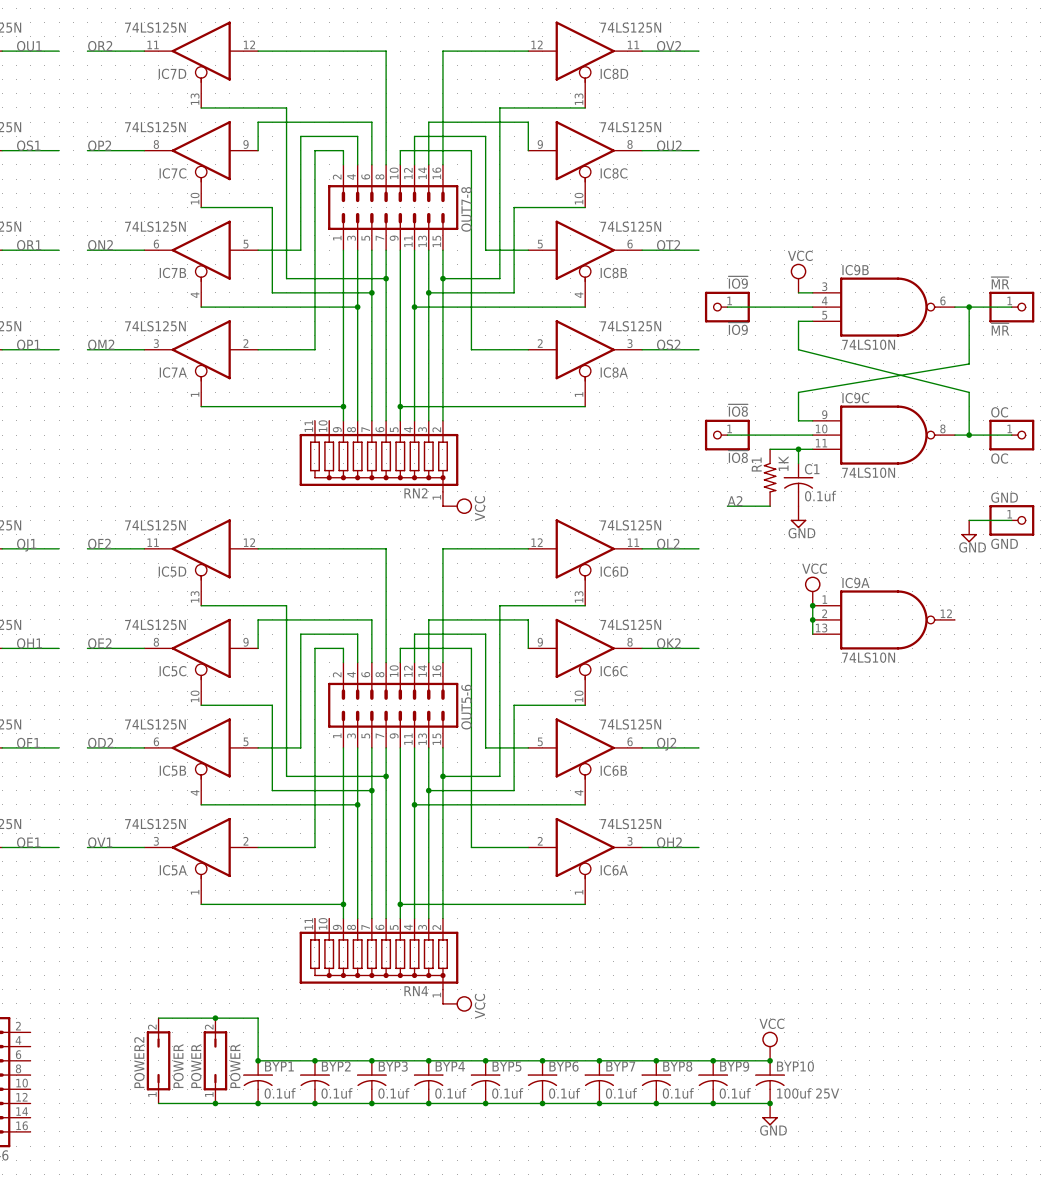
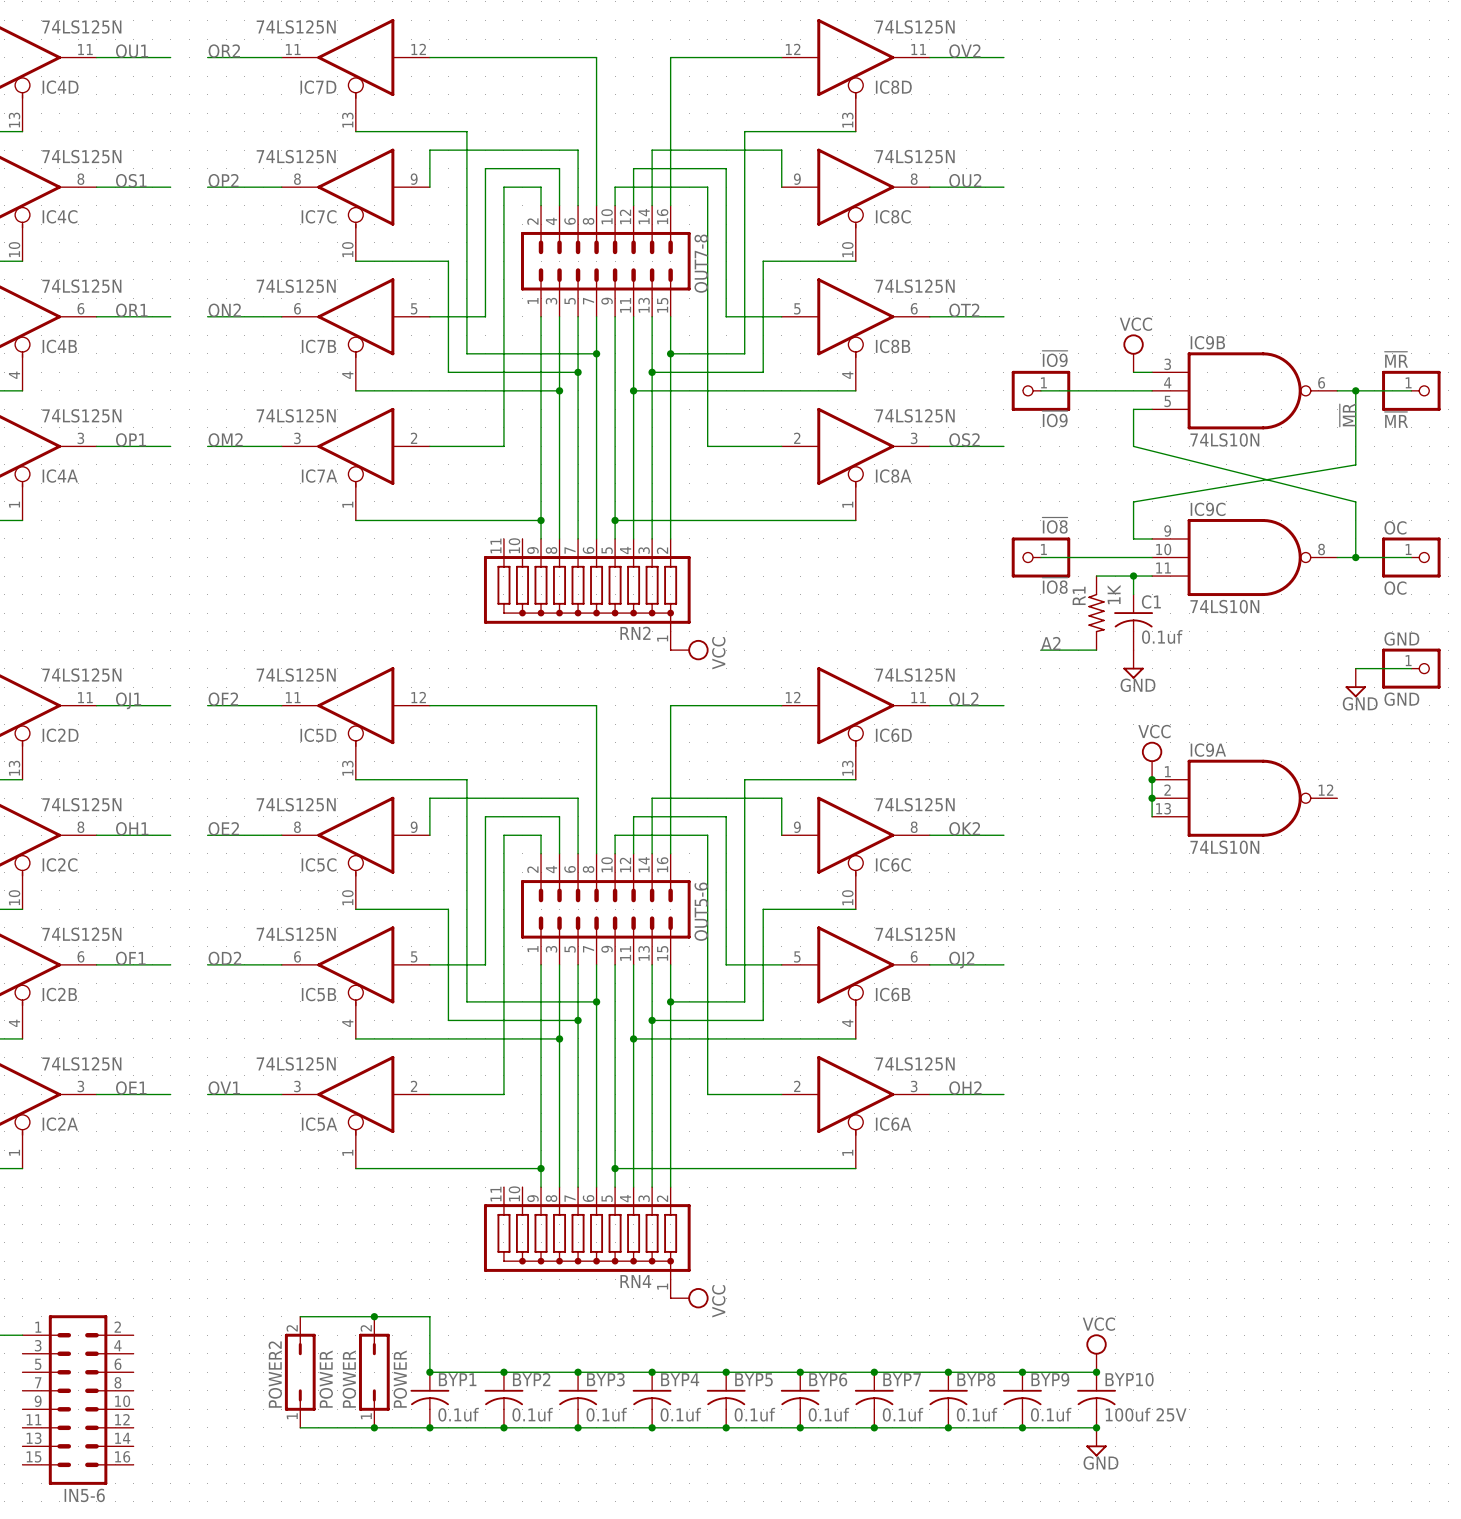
label: none -> ~{MR} (1347, 415)

